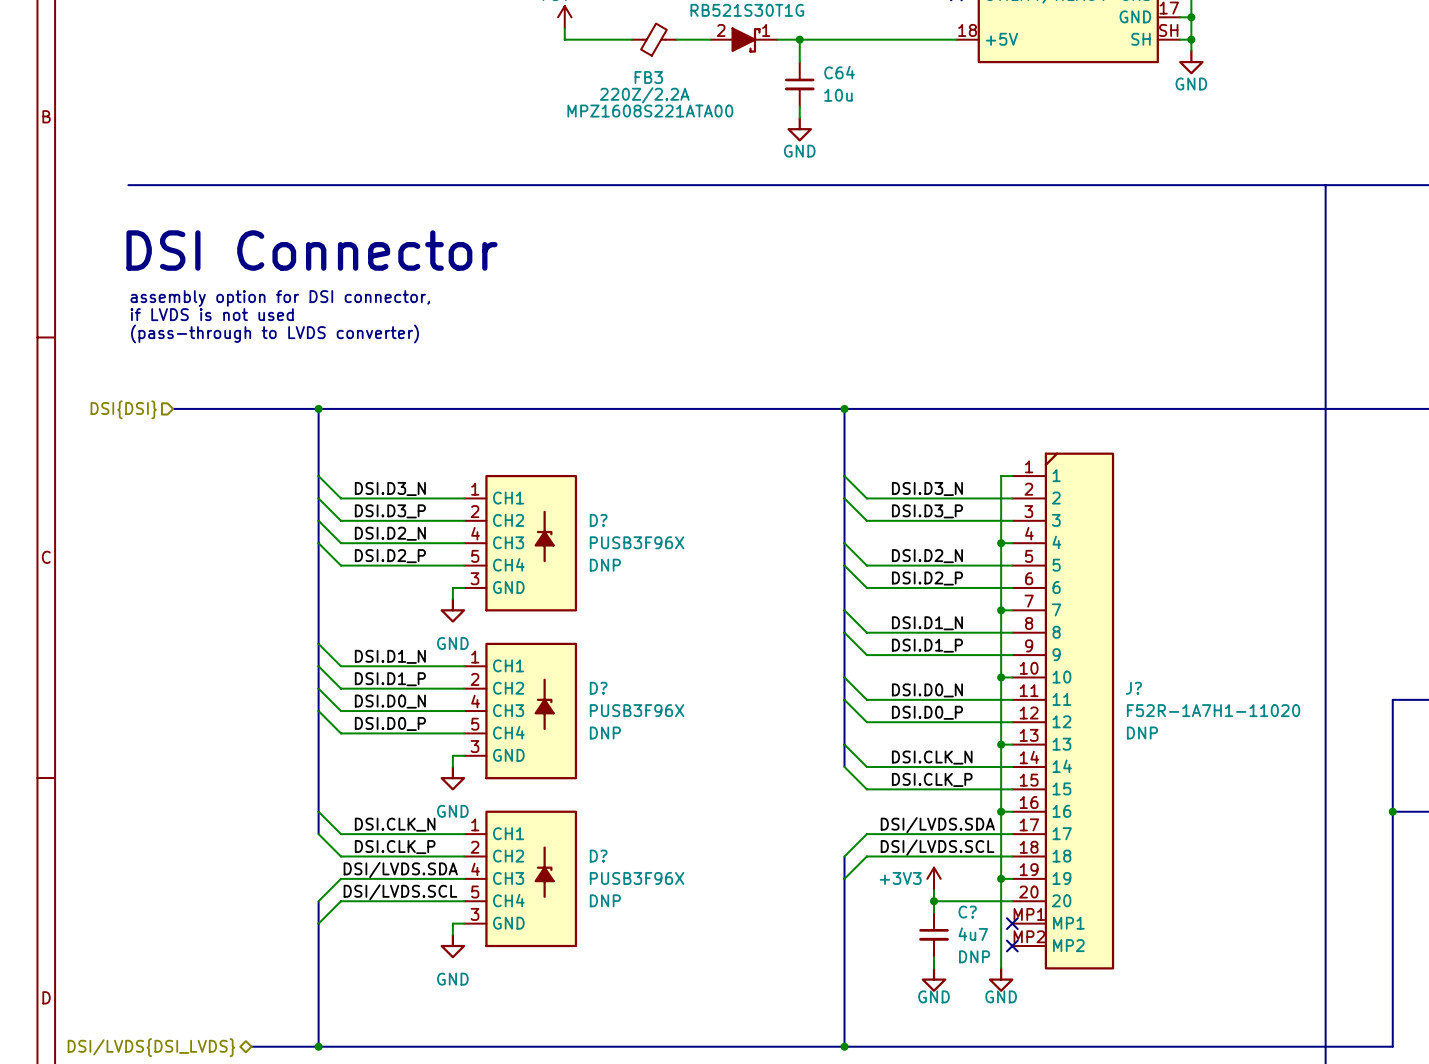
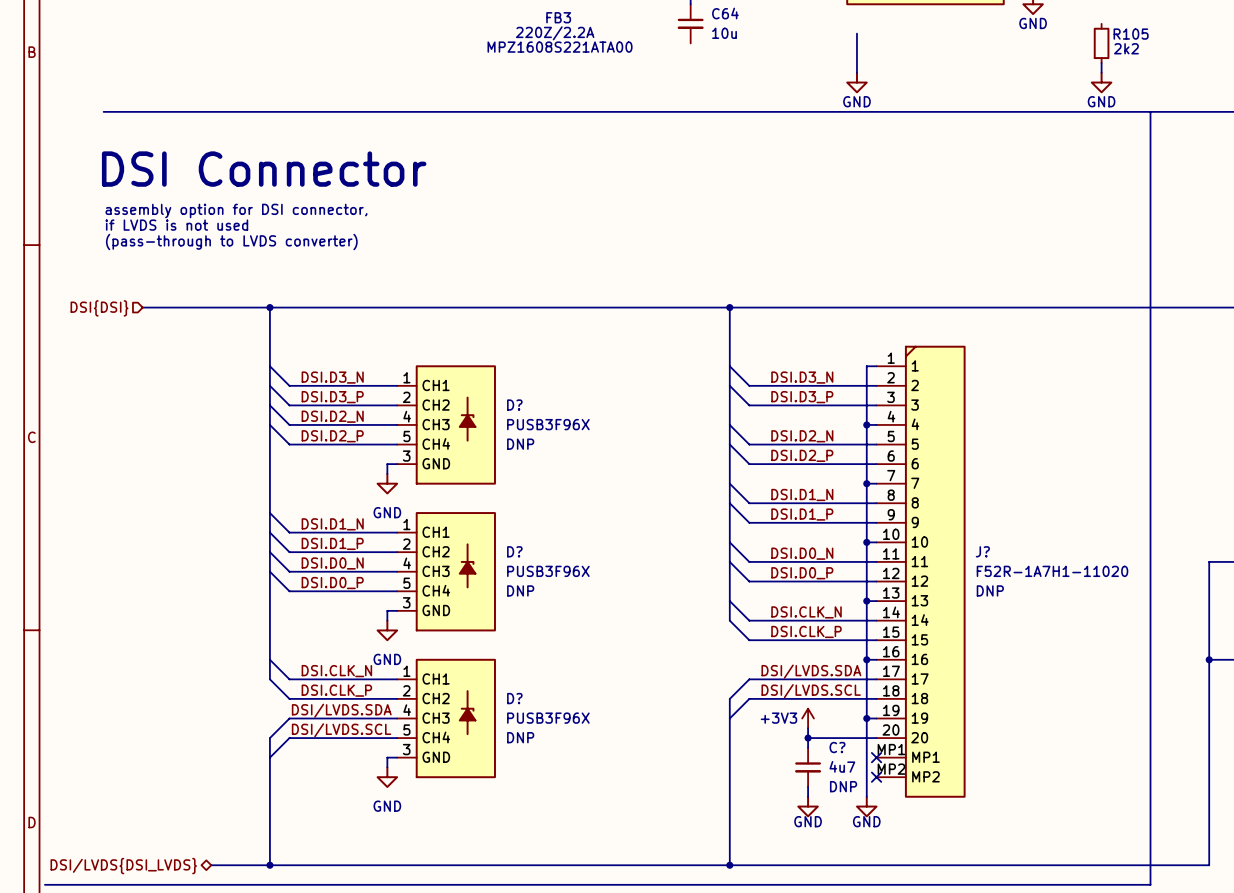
wire: none -> (856, 33) (856, 72)
wire: (799, 106) (799, 118) -> none
R105: none -> (1101, 43)
power symbol position: GND (799, 129) -> GND (856, 82)
wire: none -> (1101, 62) (1101, 72)
power symbol: none -> GND (1101, 82)

